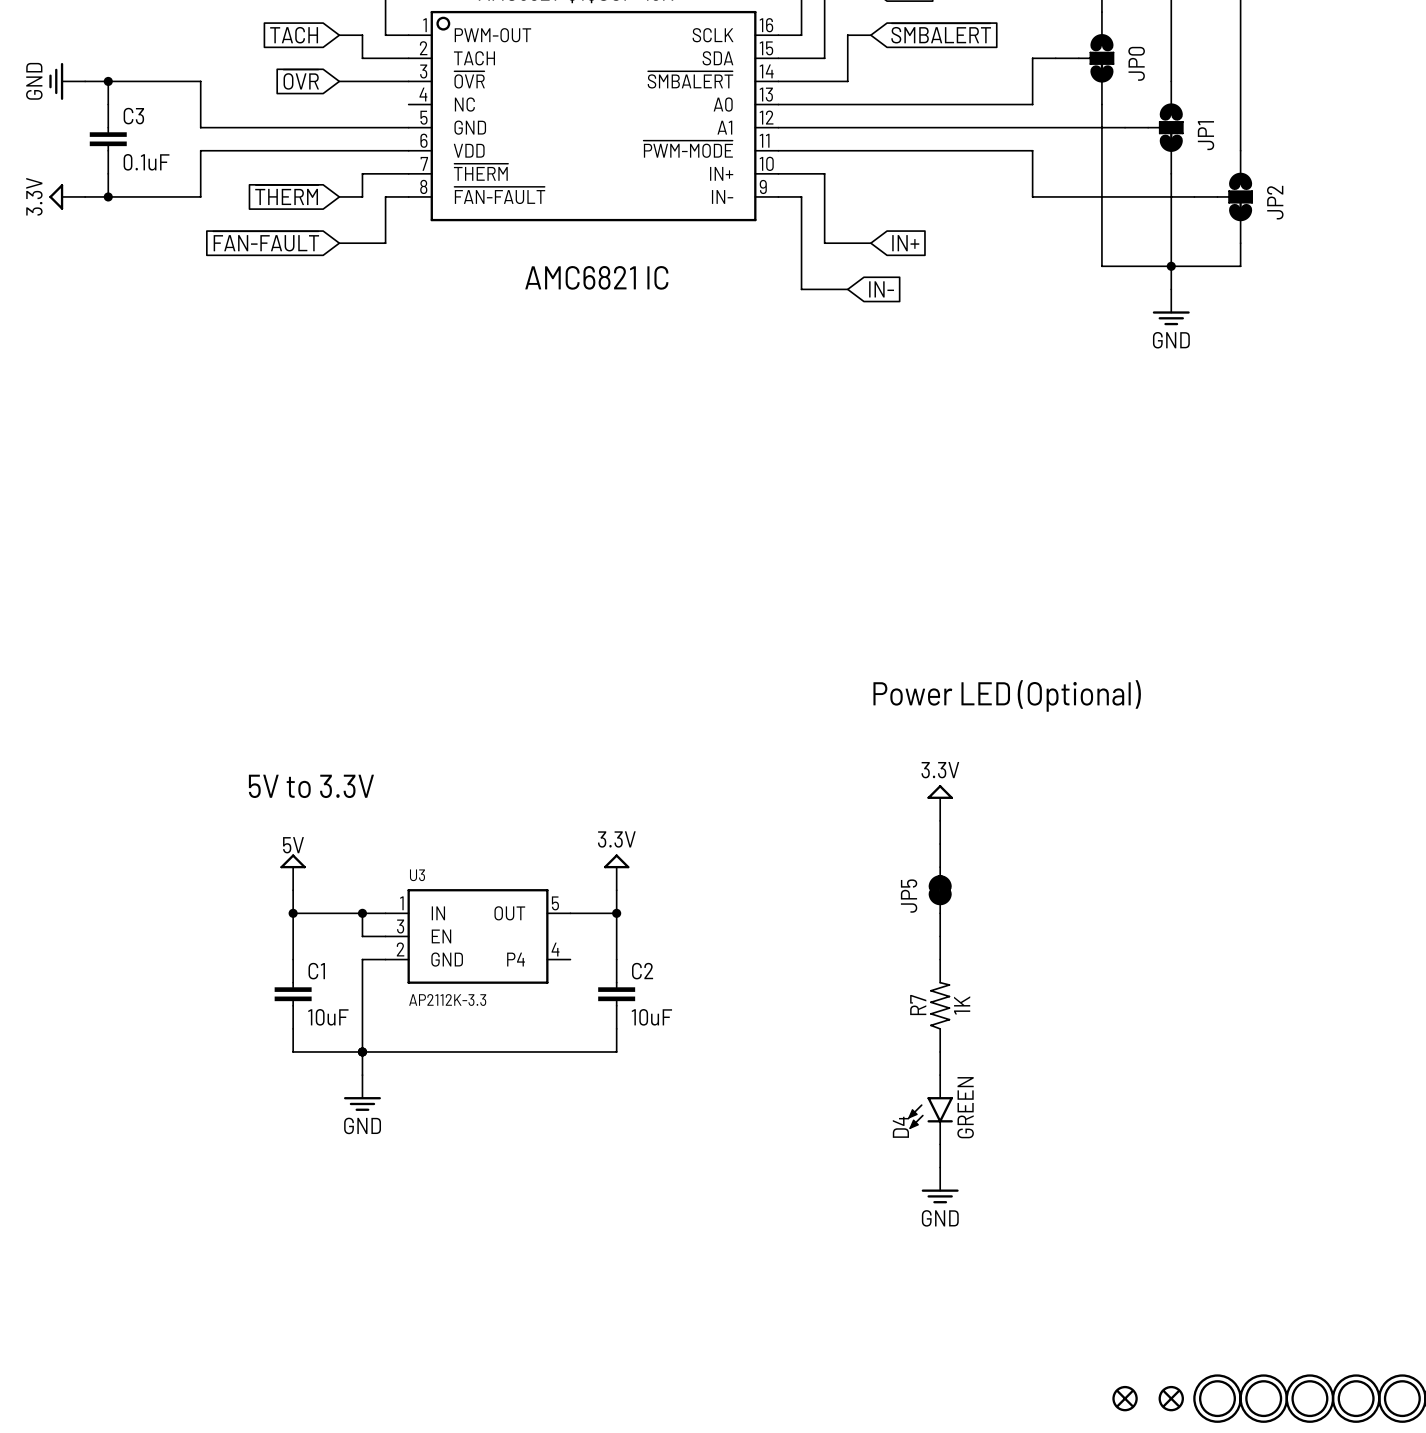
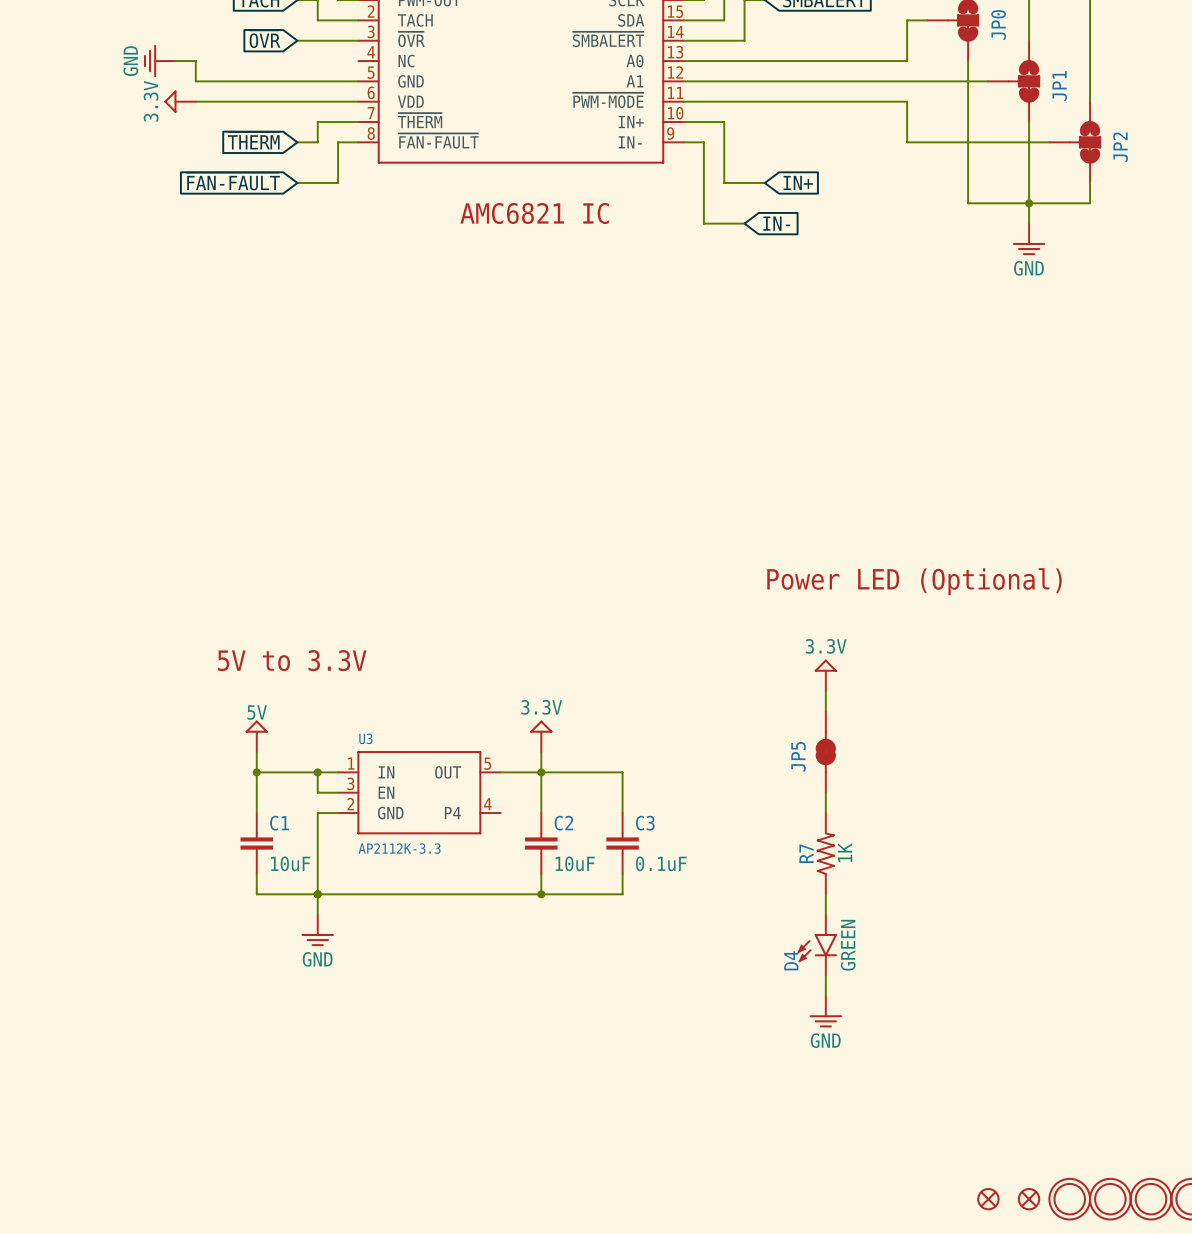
power symbol position: GND (67, 81) -> GND (159, 61)
wire: (85, 81) (200, 81) (200, 127) (223, 127) -> (175, 61) (195, 61) (195, 81)
wire: (108, 81) (108, 104) -> none
junction: (108, 81) -> none
C3 position: (108, 139) -> (622, 843)
wire: (223, 150) (200, 150) (200, 196) (85, 196) -> none
wire: (108, 173) (108, 196) -> none
power symbol position: 3.3V (67, 196) -> 3.3V (180, 101)
junction: (108, 196) -> none
wire: none -> (541, 772) (622, 772) (622, 813)
wire: none -> (622, 873) (622, 894) (541, 894)
junction: none -> (541, 894)

